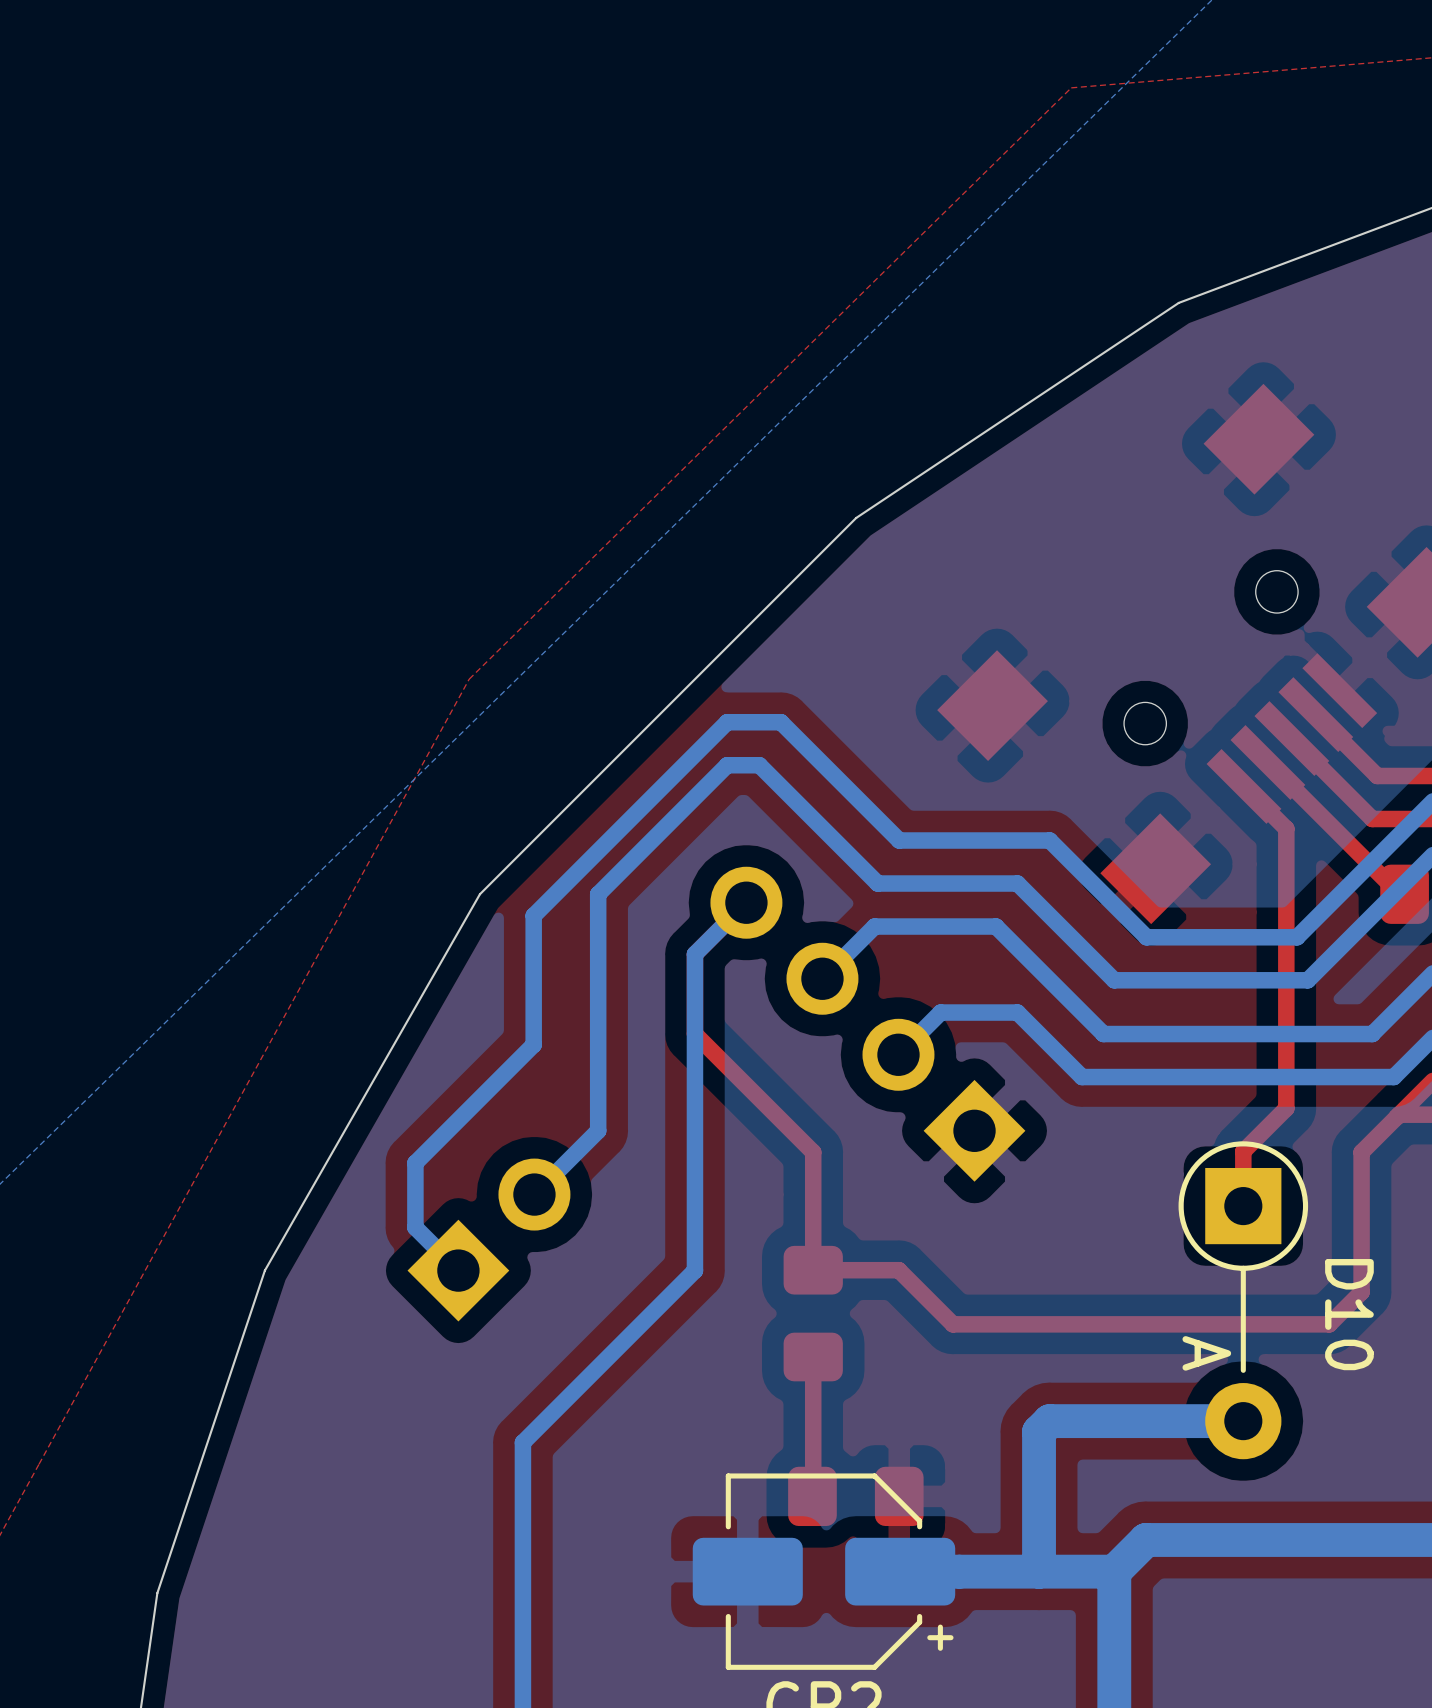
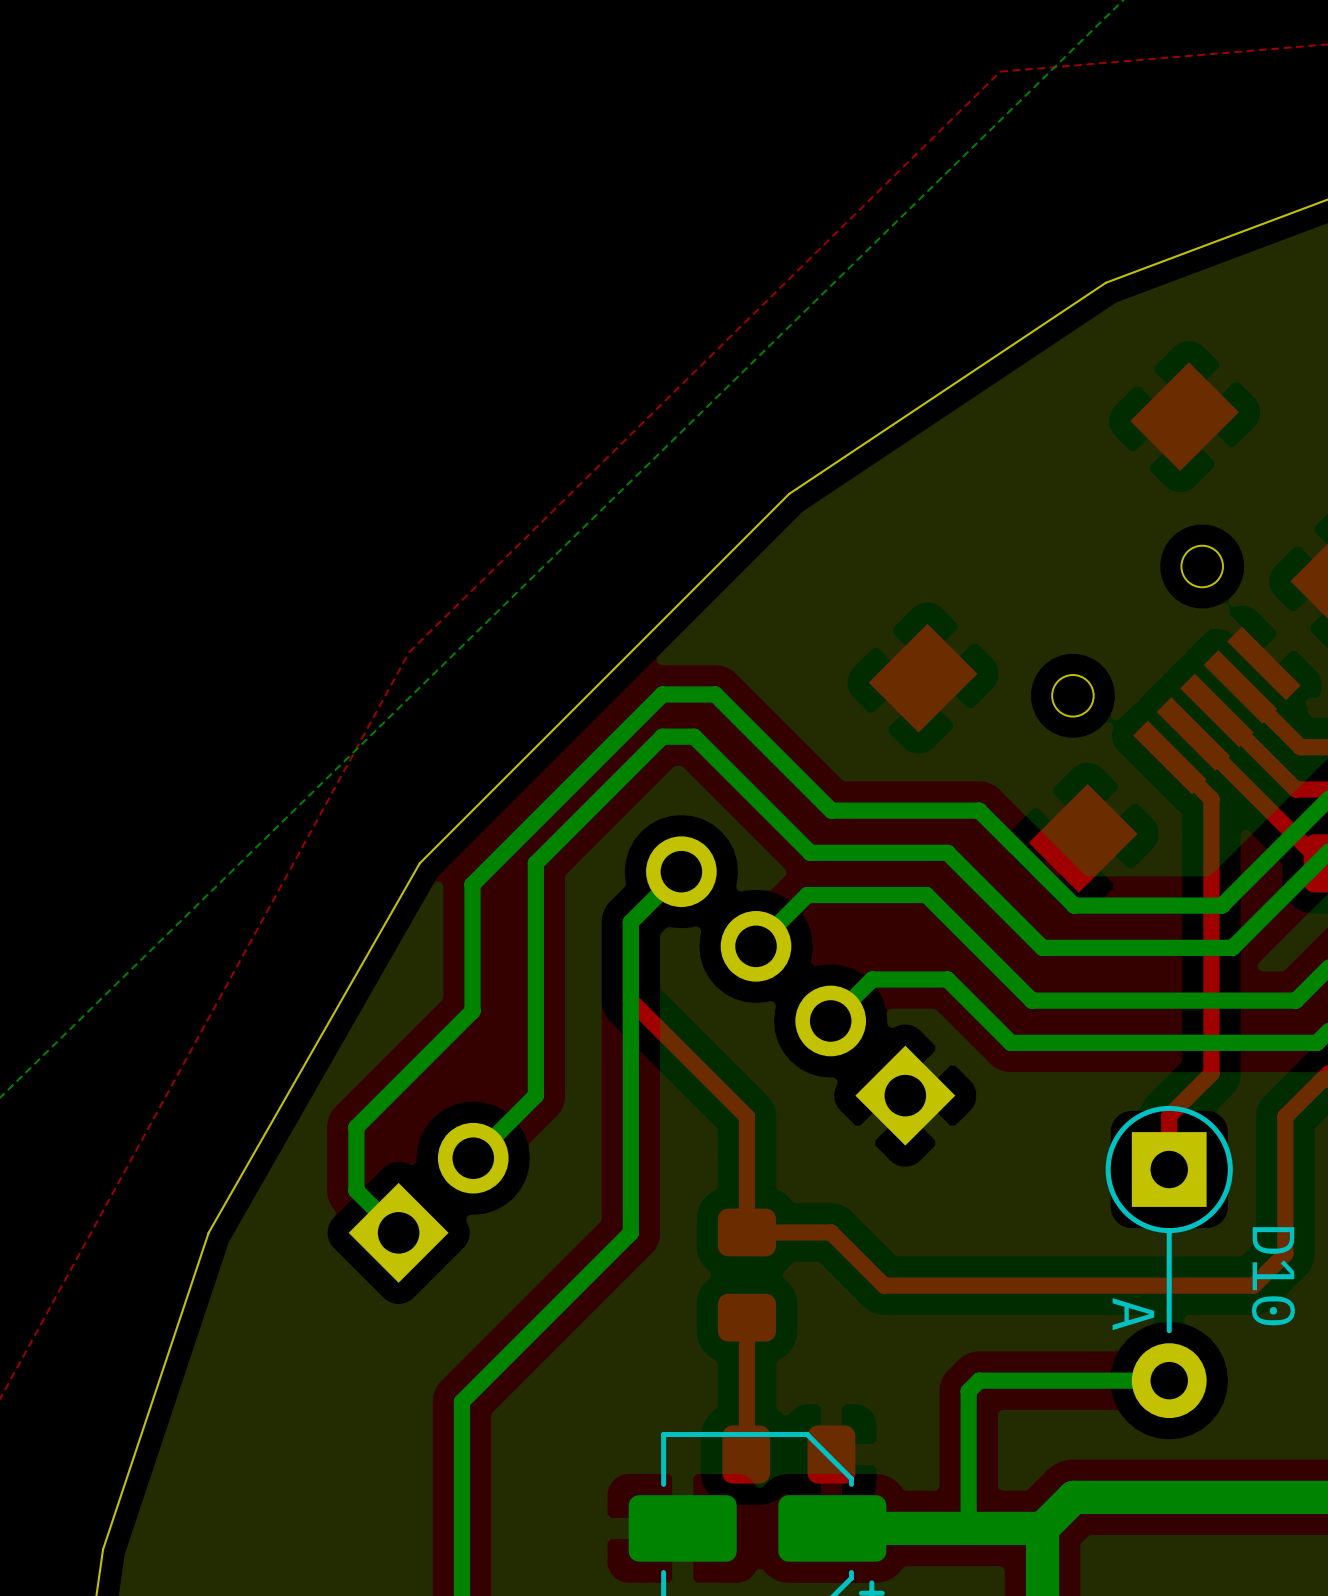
bottom track width: thick (1243, 1421) (1049, 1421) (1039, 1431) (1039, 1571) -> thin (1169, 1380) (979, 1380) (968, 1391) (968, 1528)

